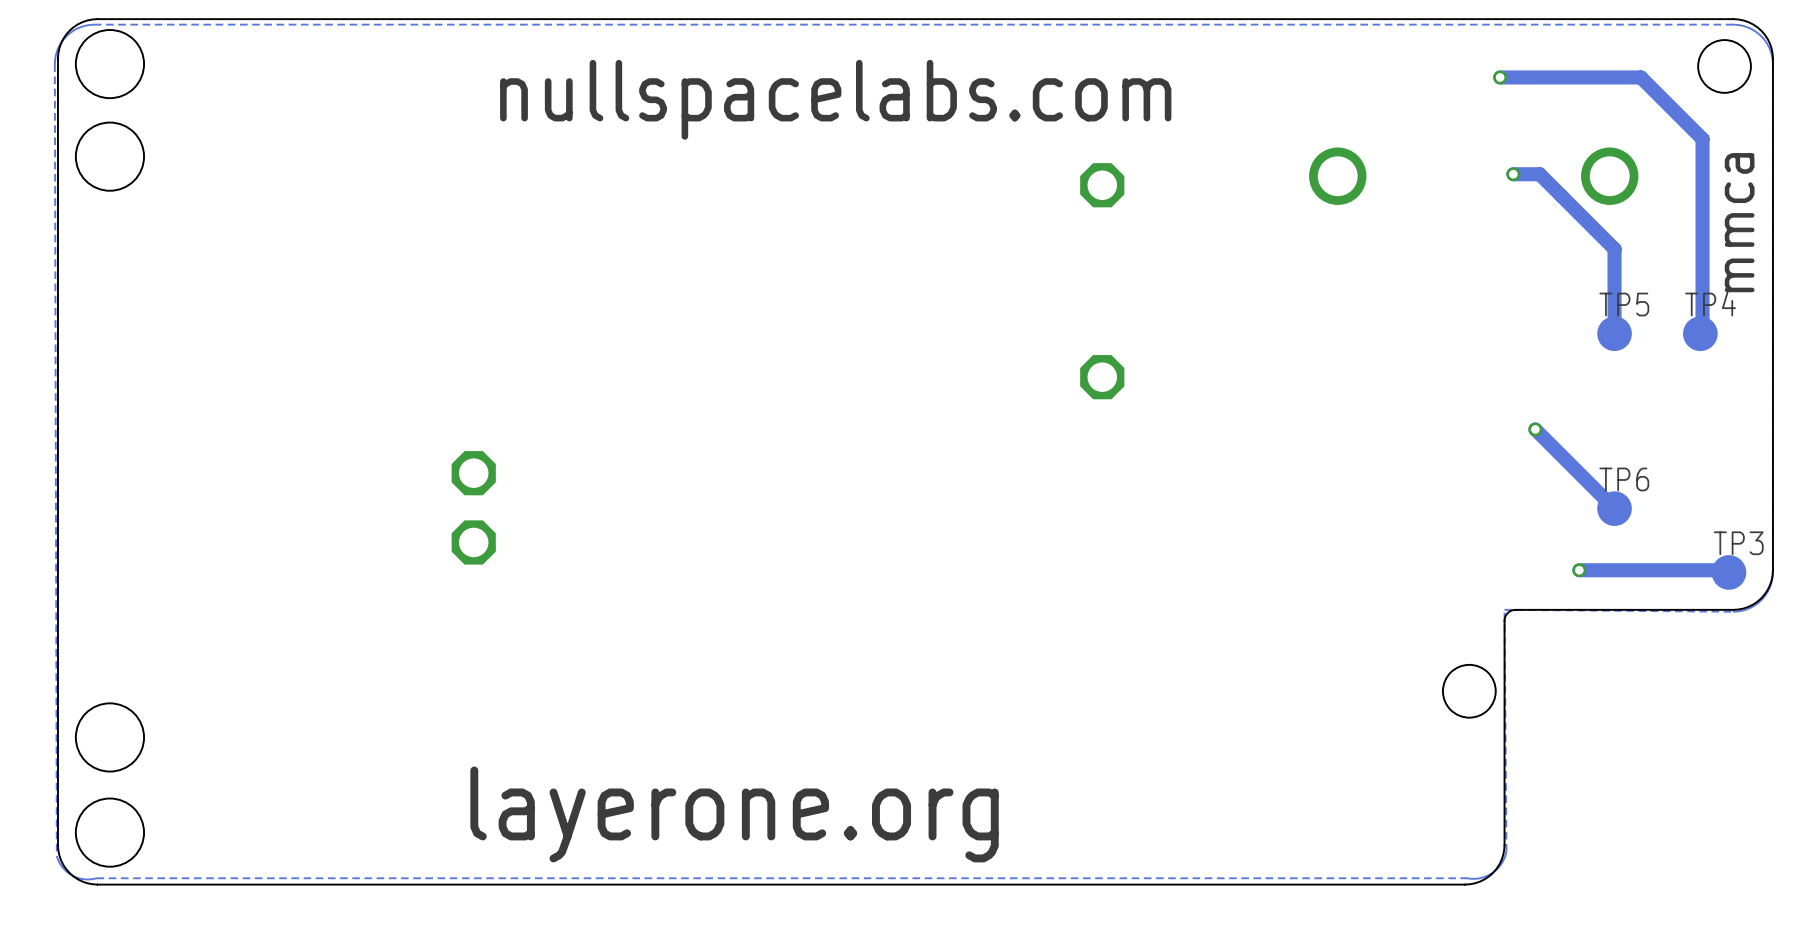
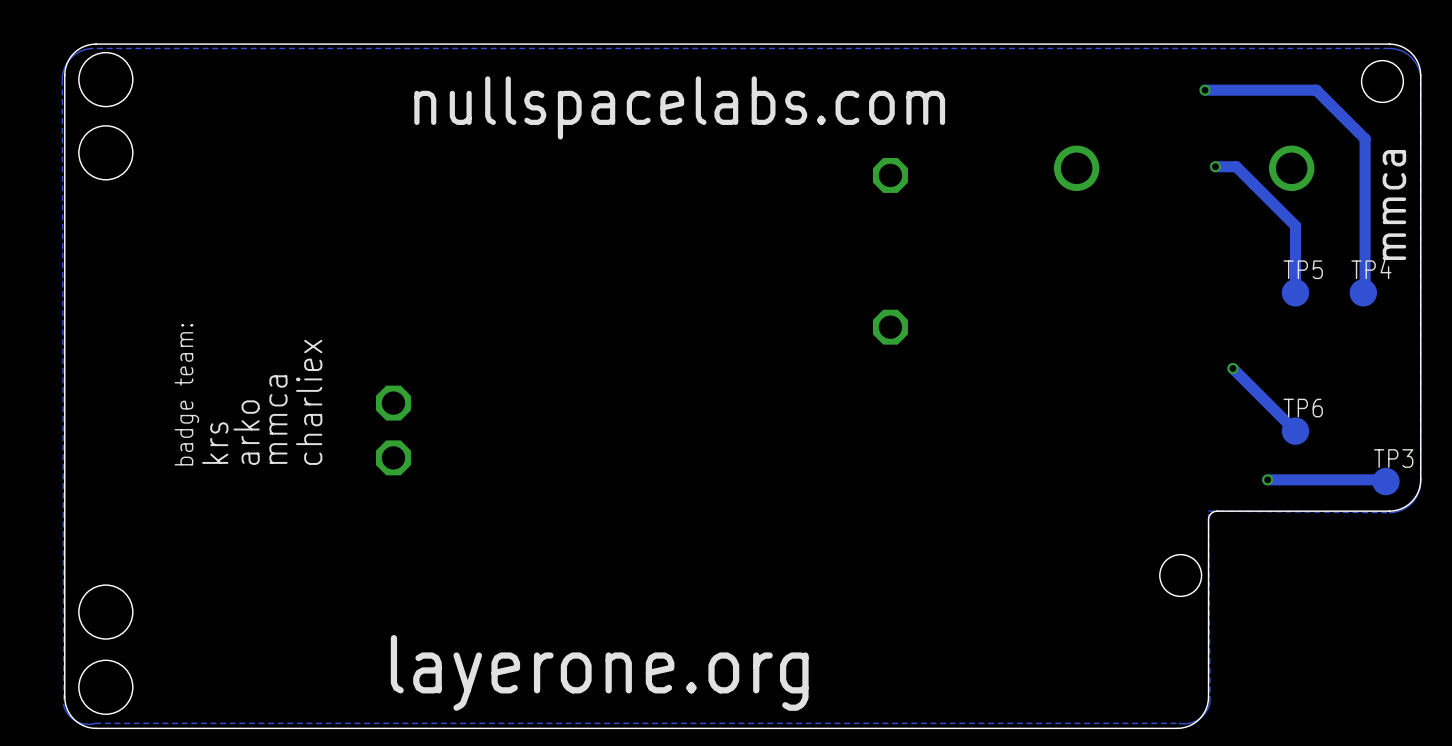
text: none -> badge team: (186, 394)
text: none -> charliex (309, 402)
text: none -> mmca (278, 419)
text: none -> arko (246, 432)
text: none -> krs (215, 443)

